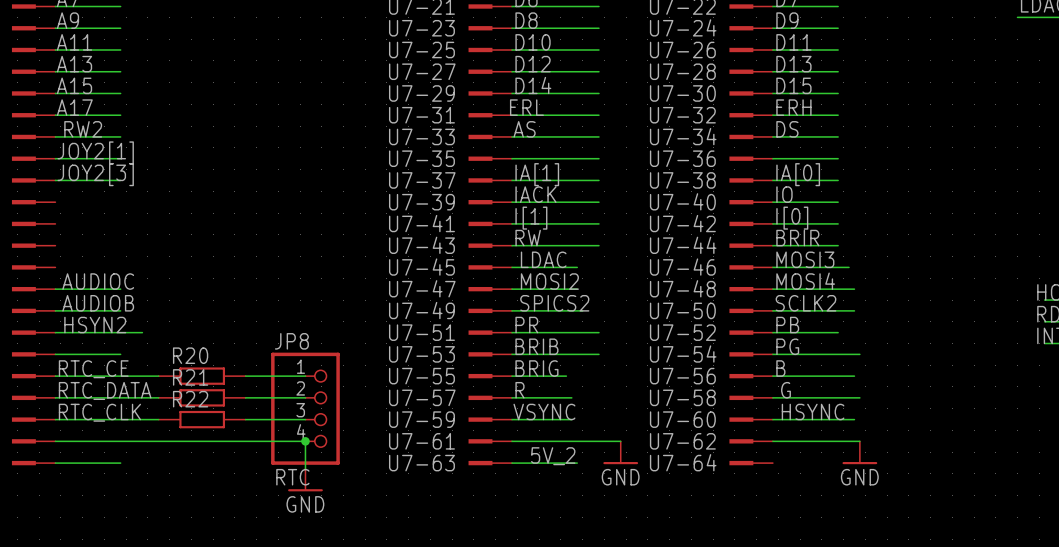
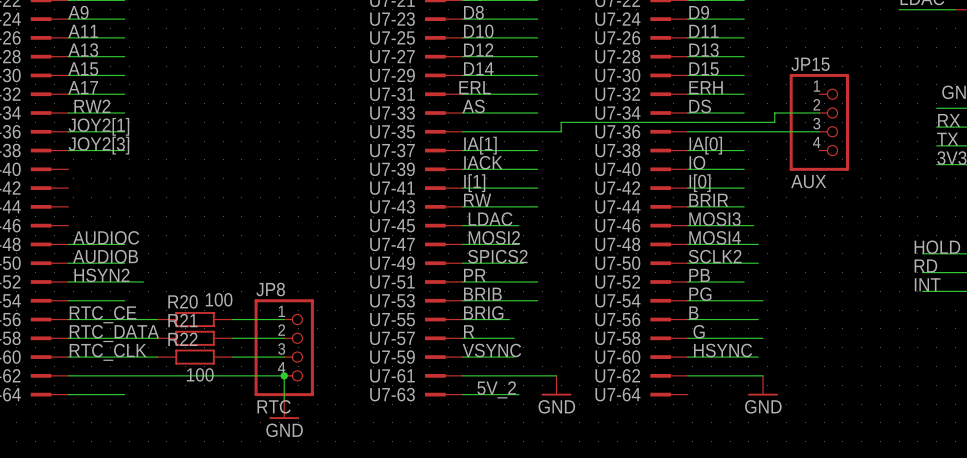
wire: none -> (819, 113) (774, 113) (774, 122) (561, 122) (561, 131) (537, 131)
JP15: none -> AUX (819, 122)
wire: none -> (744, 131) (819, 131)
R21 value: none -> 100 (219, 299)
R20 value: none -> 100 (200, 374)

